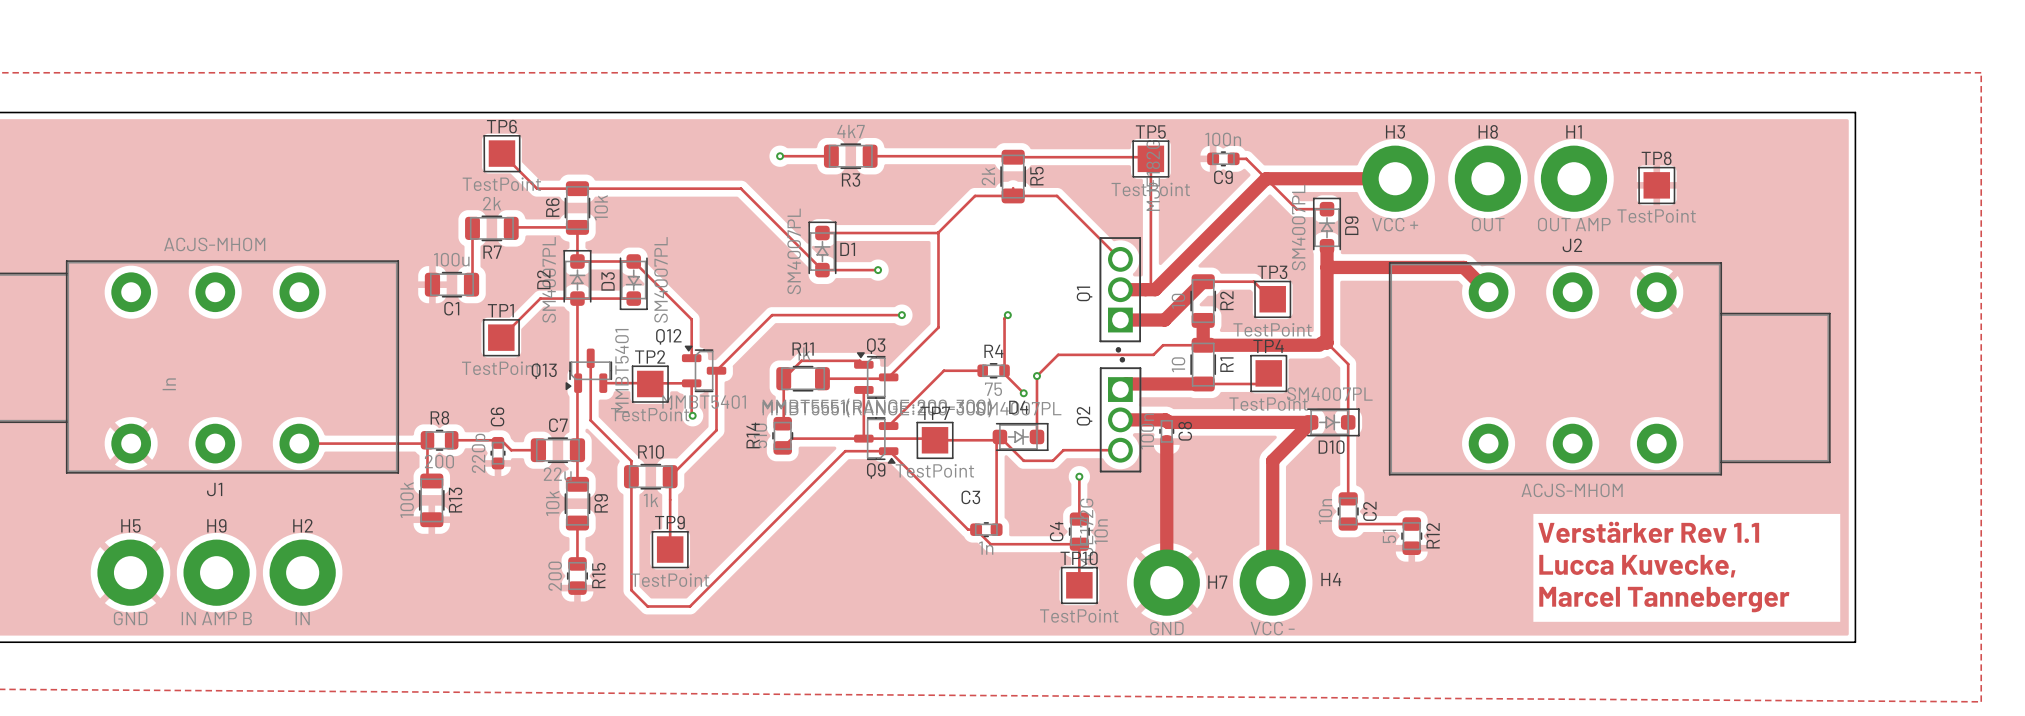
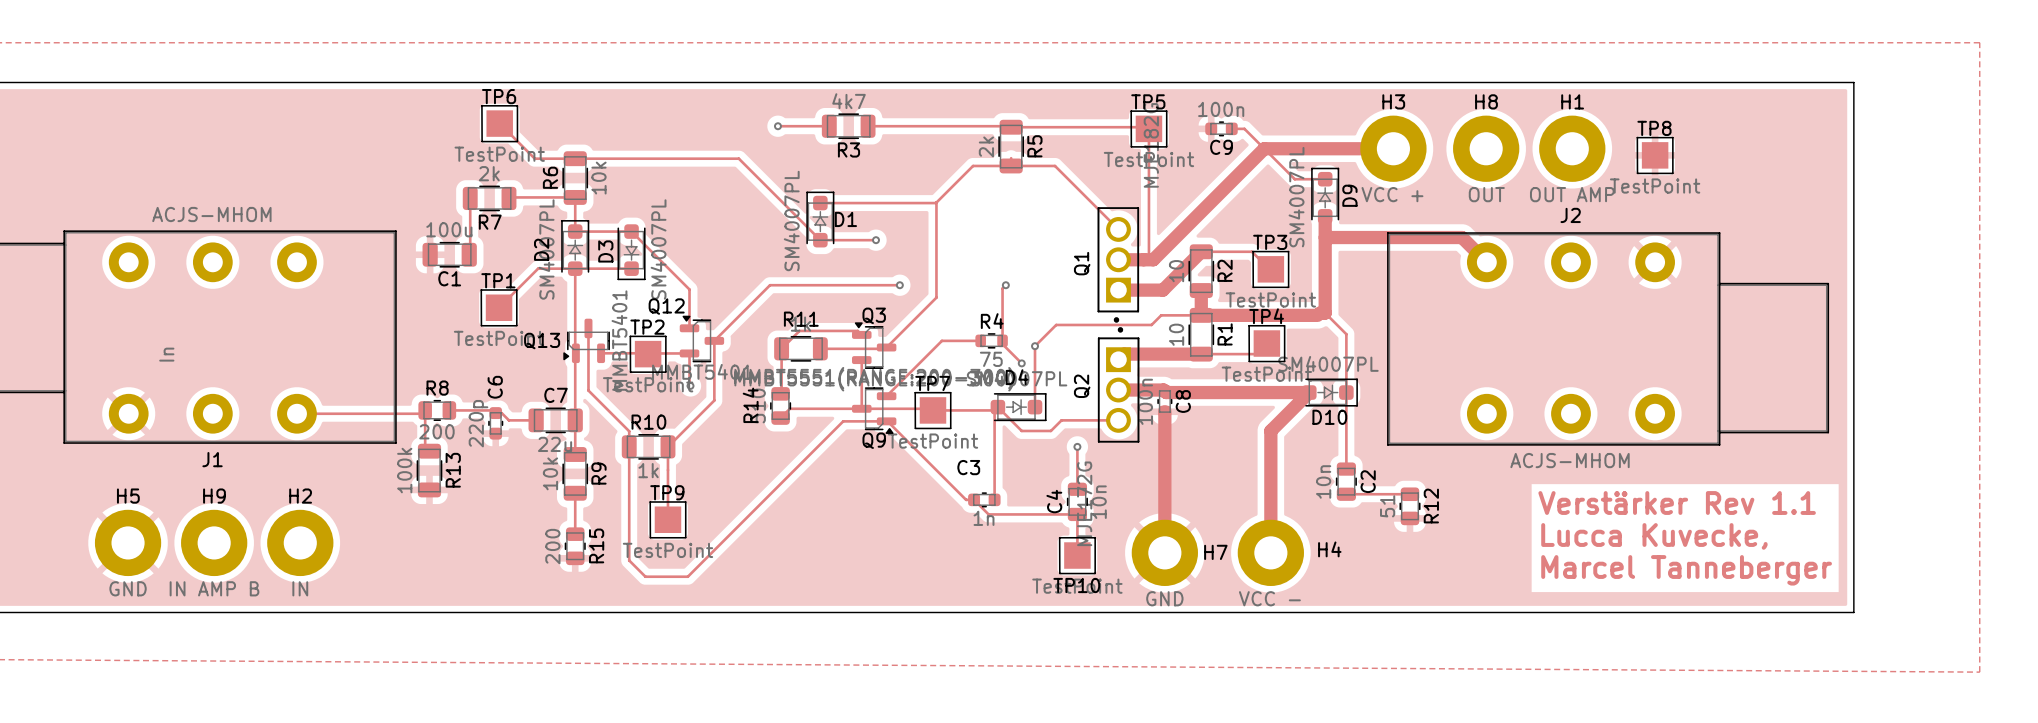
TP10 name position: TP10 (1079, 558) -> TP10 (1076, 585)

